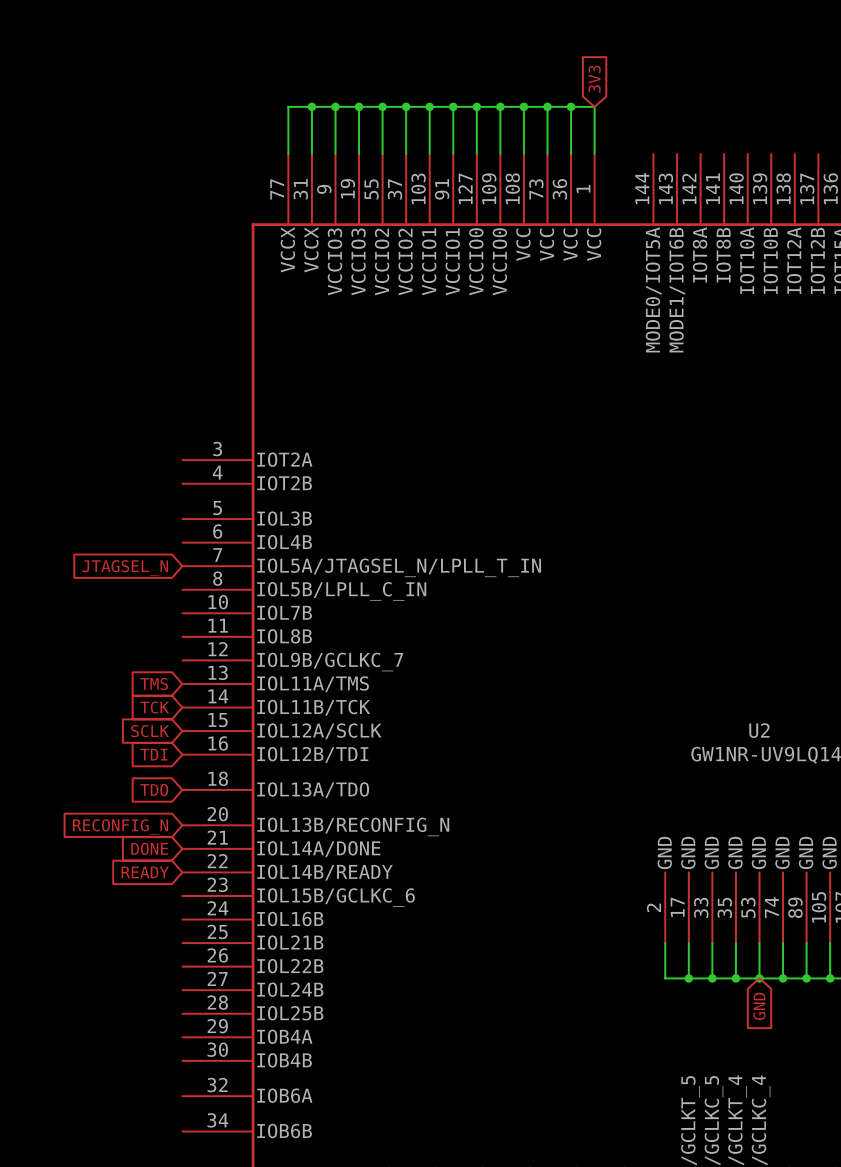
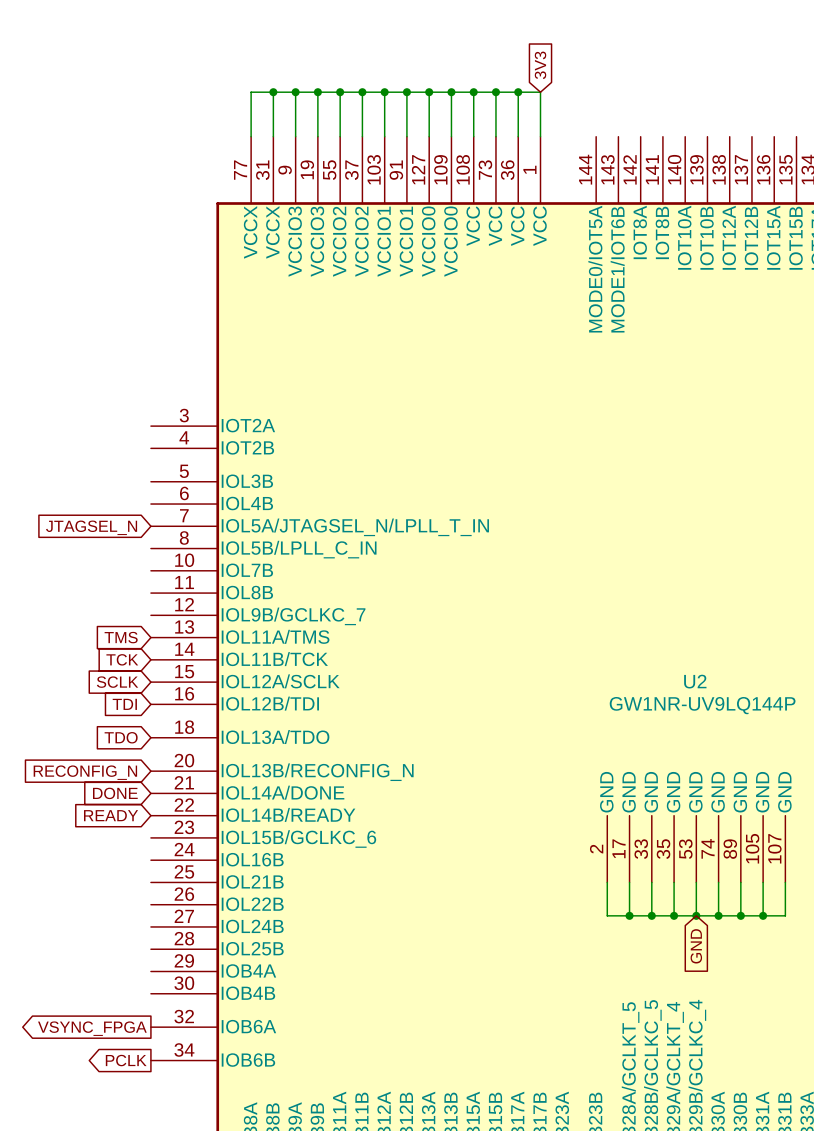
global label: none -> VSYNC_FPGA (92, 1028)
global label: none -> PCLK (126, 1060)

